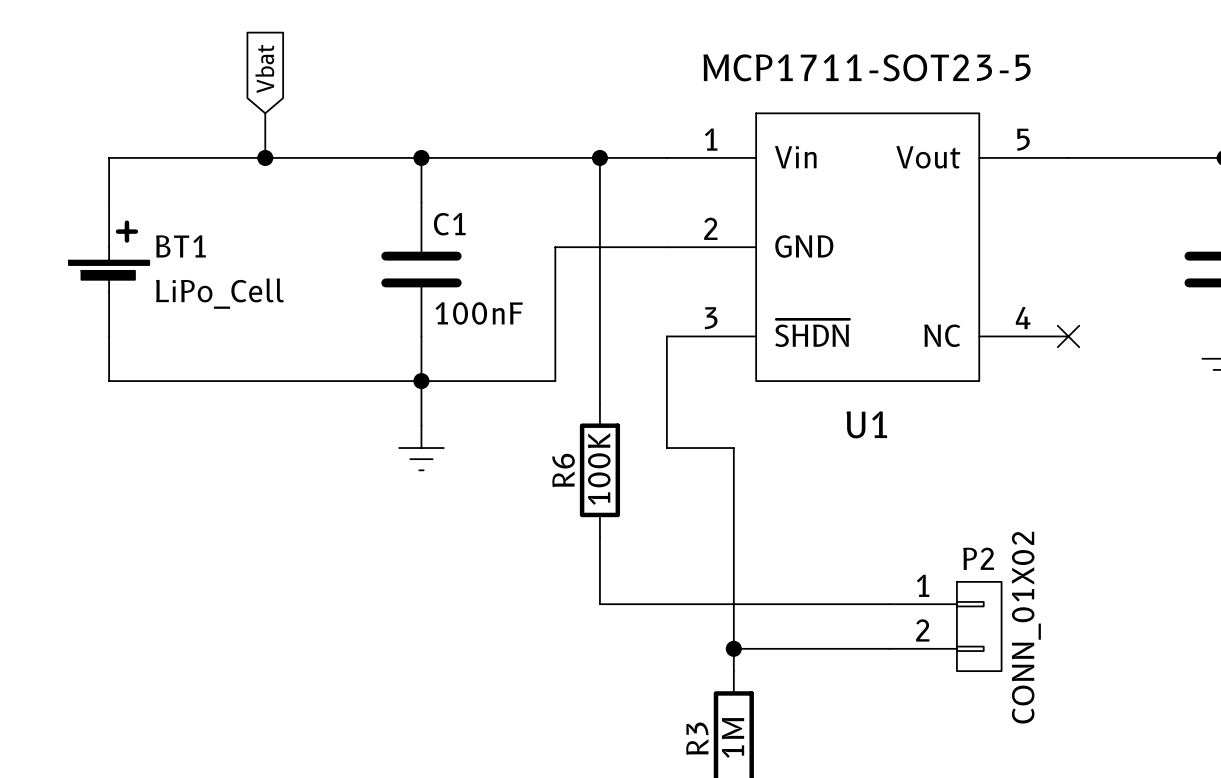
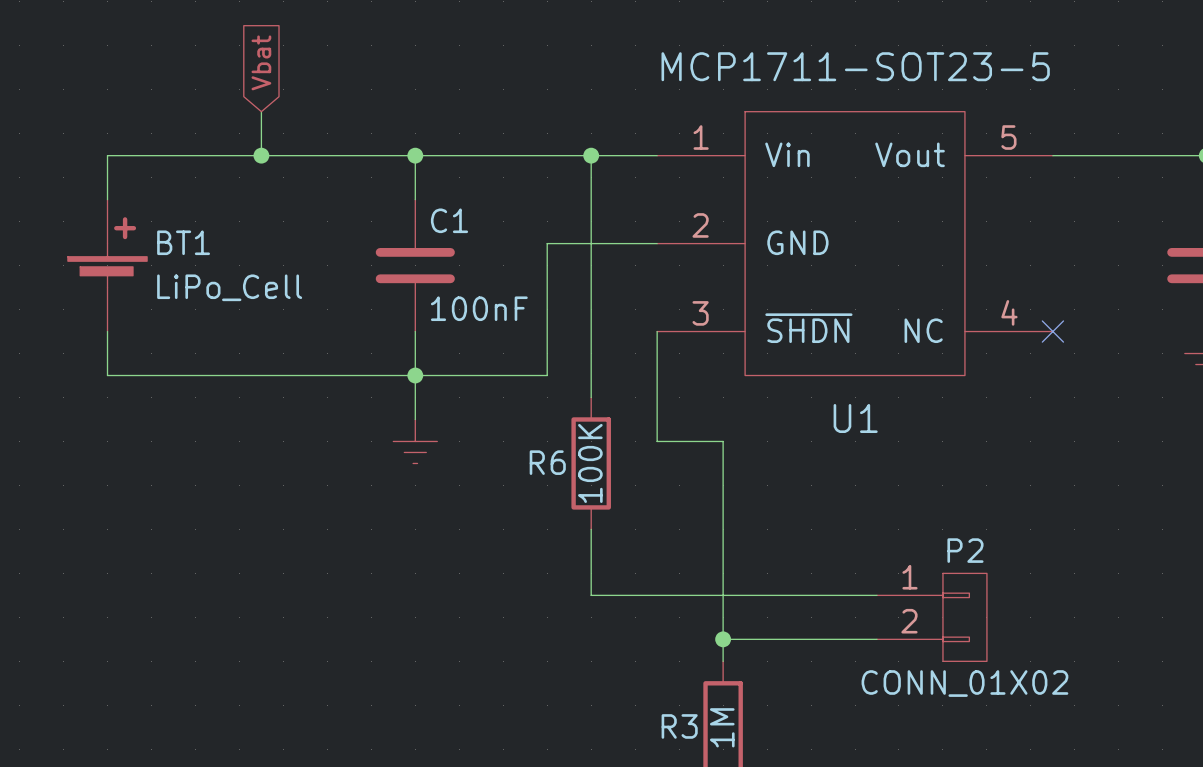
R6 name rotation: 0° (563, 470) -> 90° clockwise (547, 462)
P2 value rotation: 0° (1026, 627) -> 90° clockwise (964, 683)
R3 name rotation: 0° (697, 738) -> 90° clockwise (679, 726)

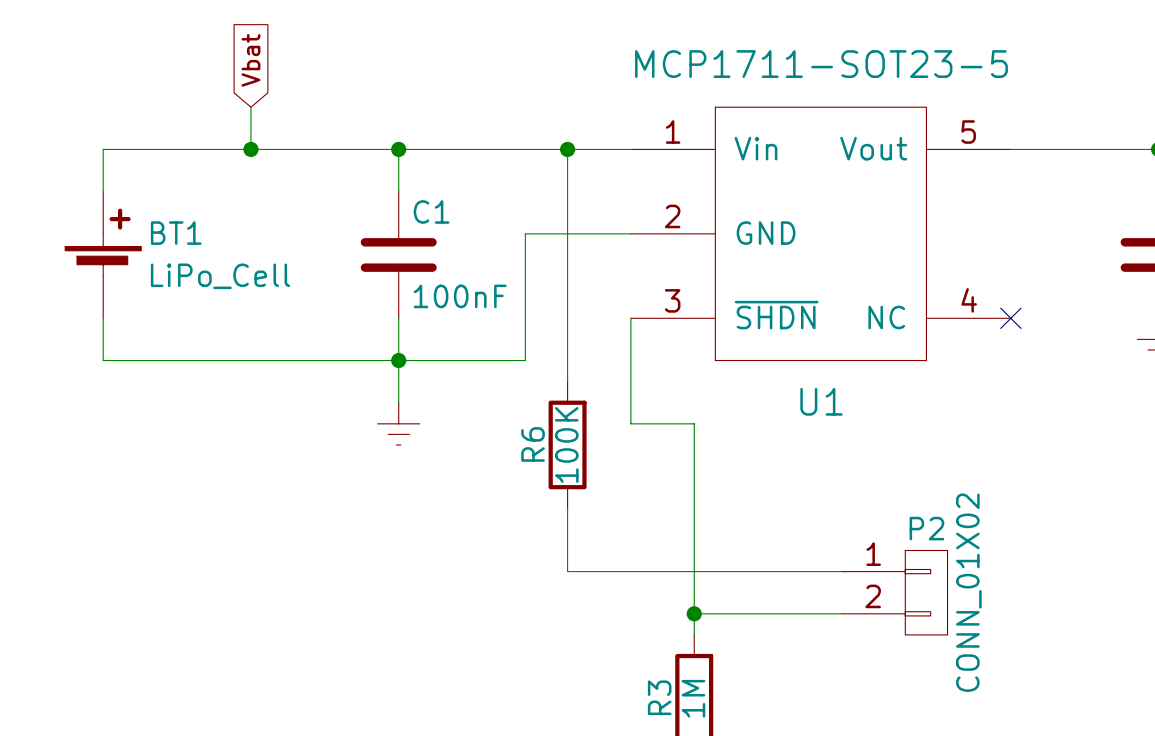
R6 name rotation: 0° (547, 462) -> 90° counterclockwise (533, 444)
P2 value rotation: 0° (964, 683) -> 90° counterclockwise (968, 592)
R3 name rotation: 0° (679, 726) -> 90° counterclockwise (659, 697)

